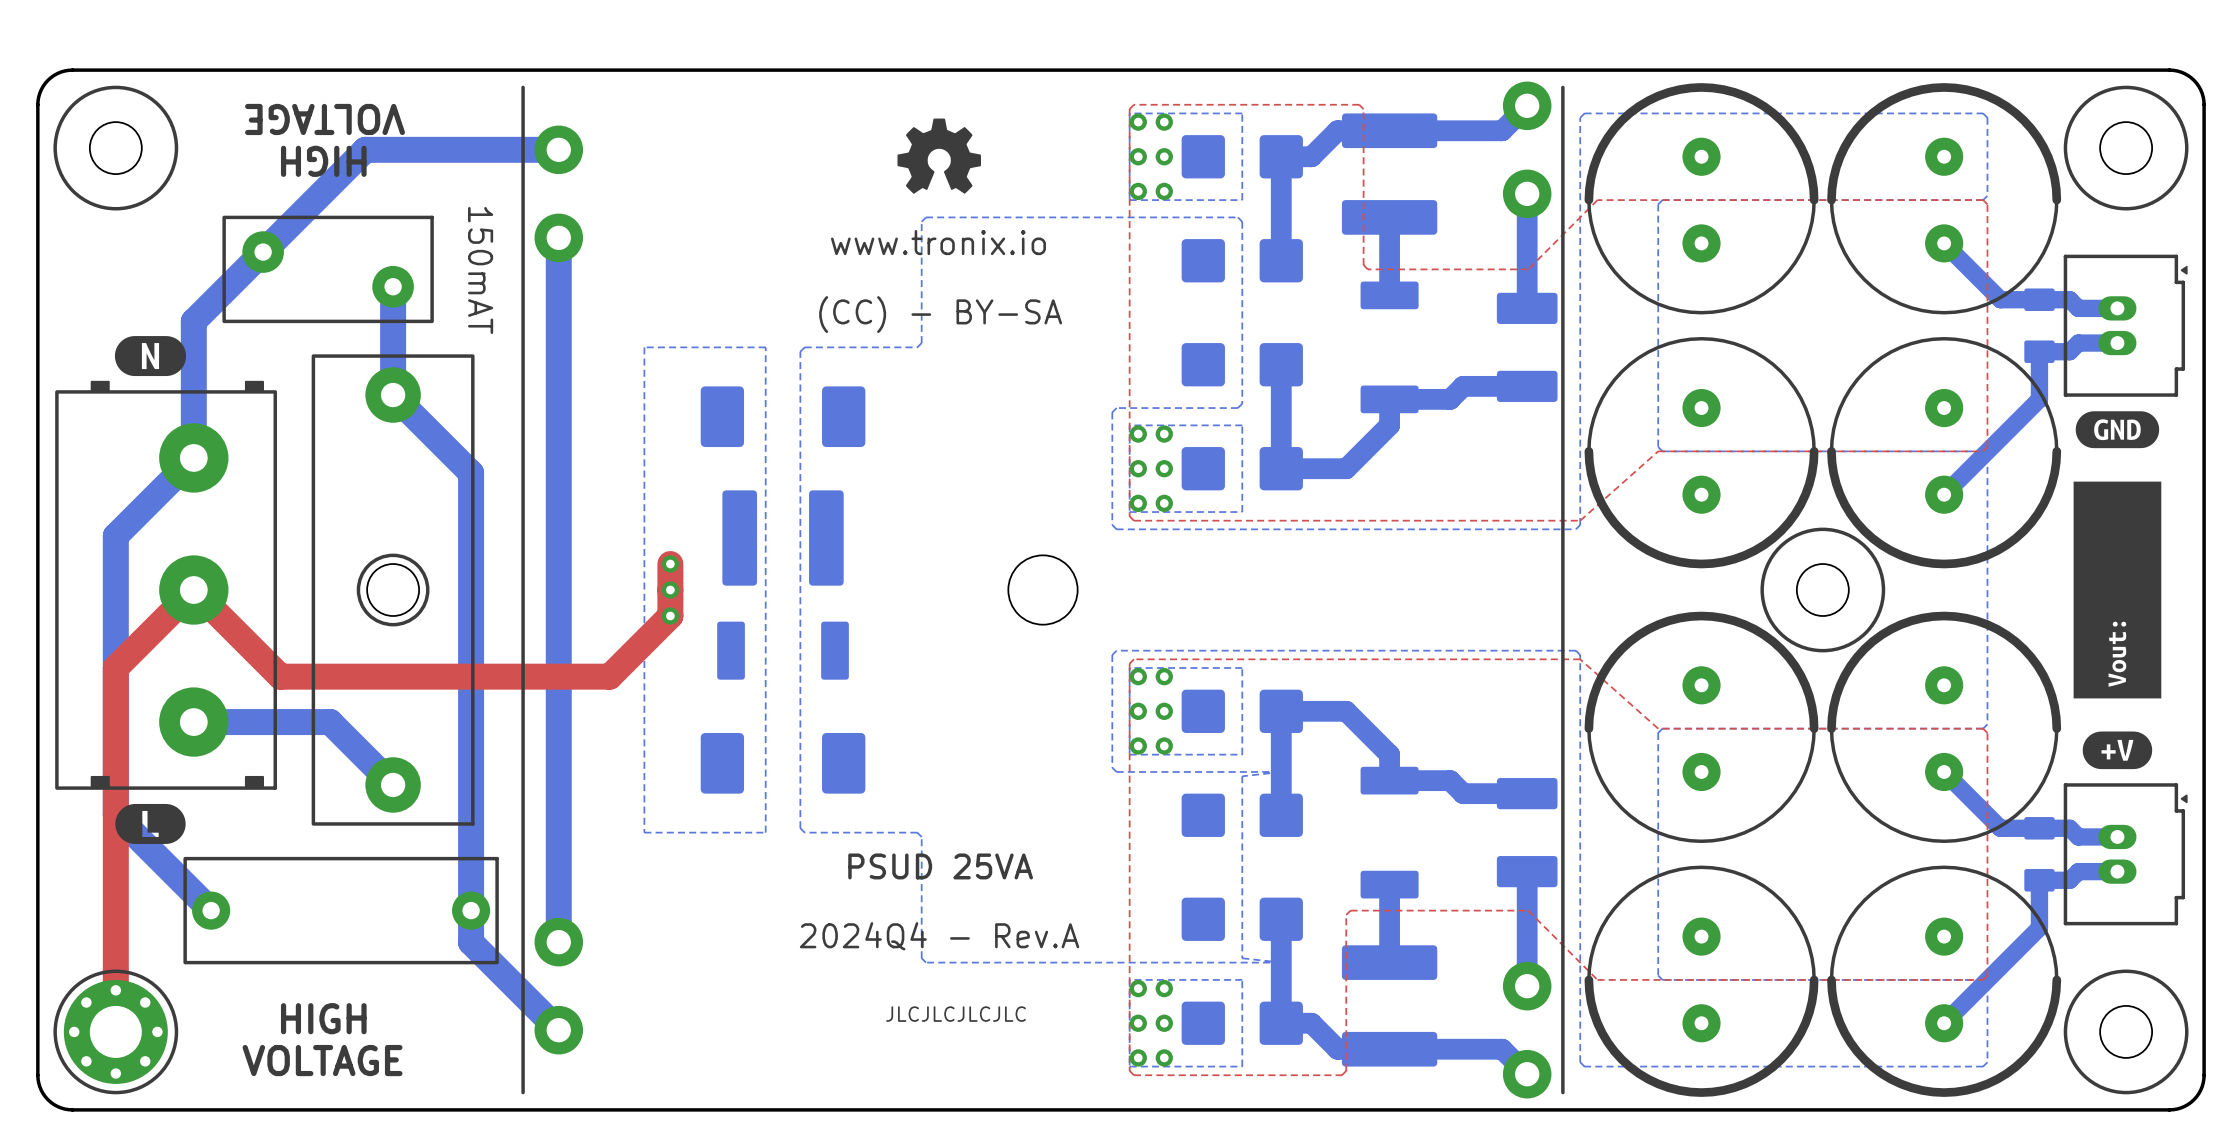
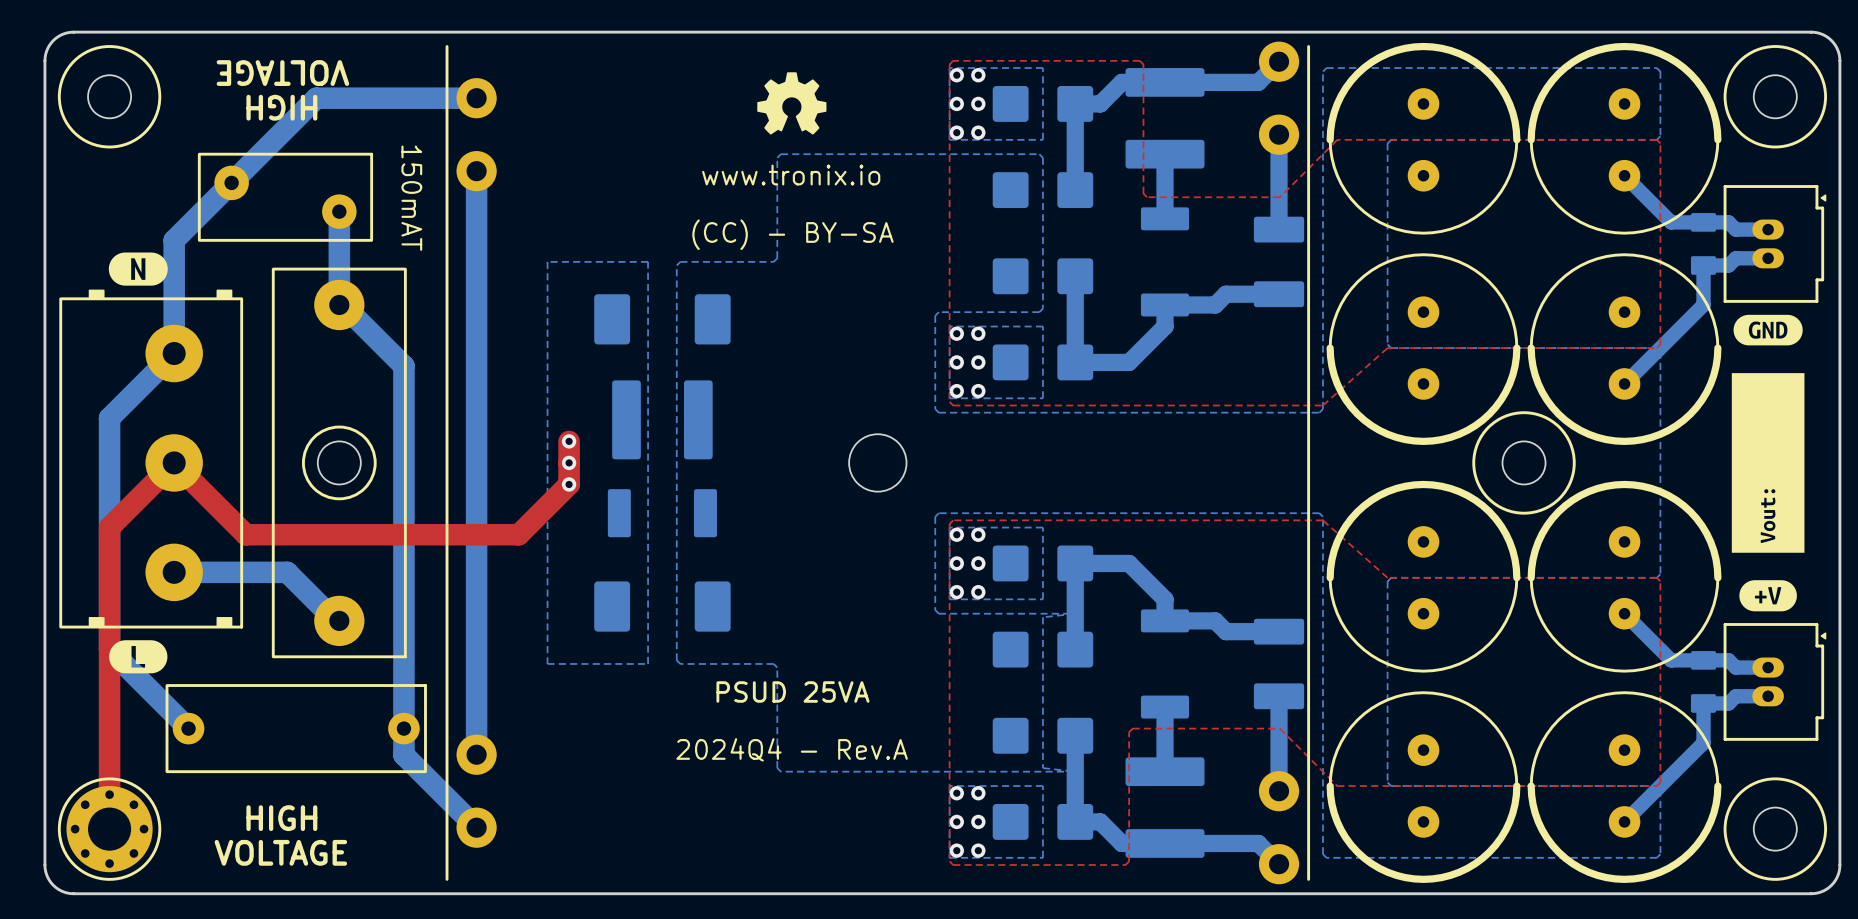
part footprint: [311, 354, 475, 826] -> [271, 267, 407, 659]
text: JLCJLCJLCJLC (956, 1014) -> none

